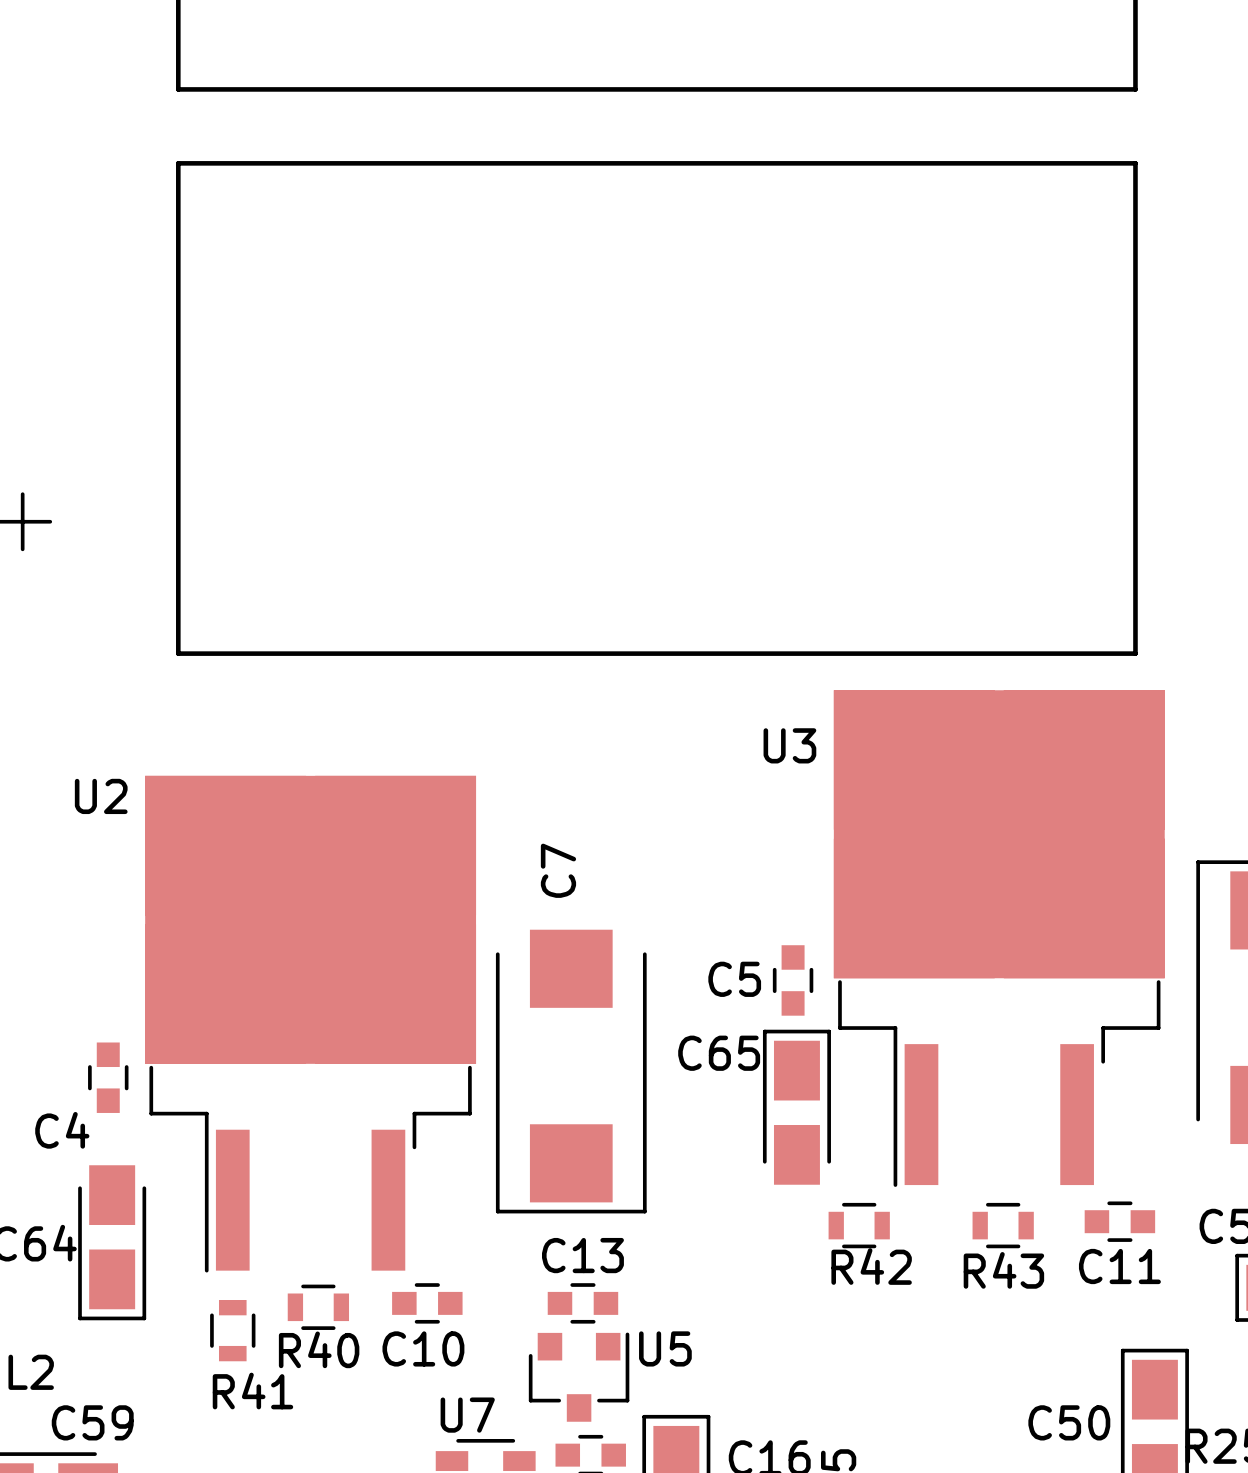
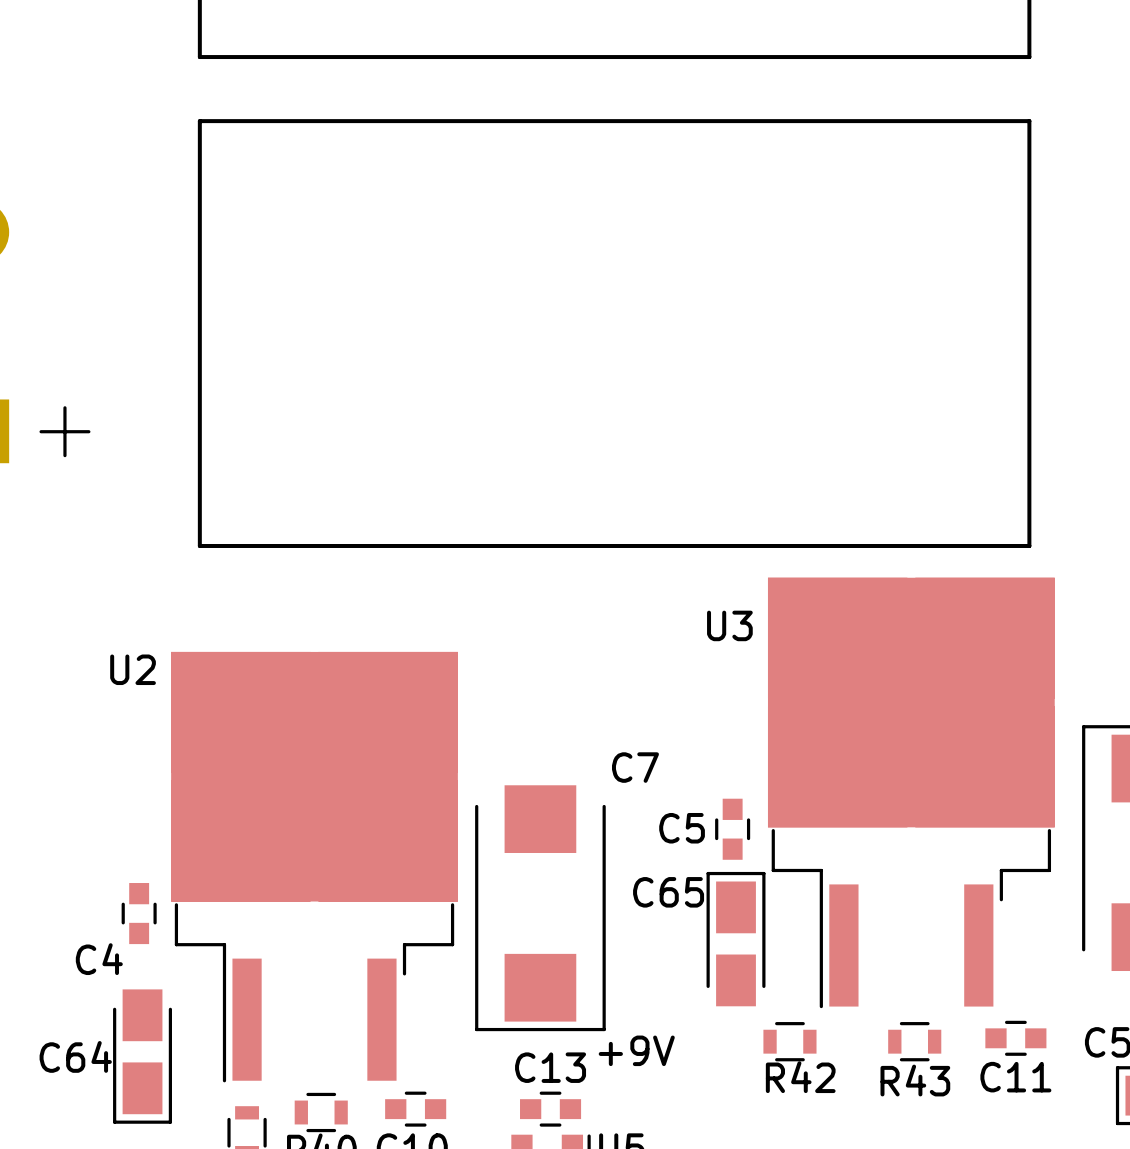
C7 name rotation: 0° (558, 870) -> 90° clockwise (635, 767)
C7 name position: C7 (558, 870) -> C7 (635, 767)
text: none -> +9V (636, 1050)

